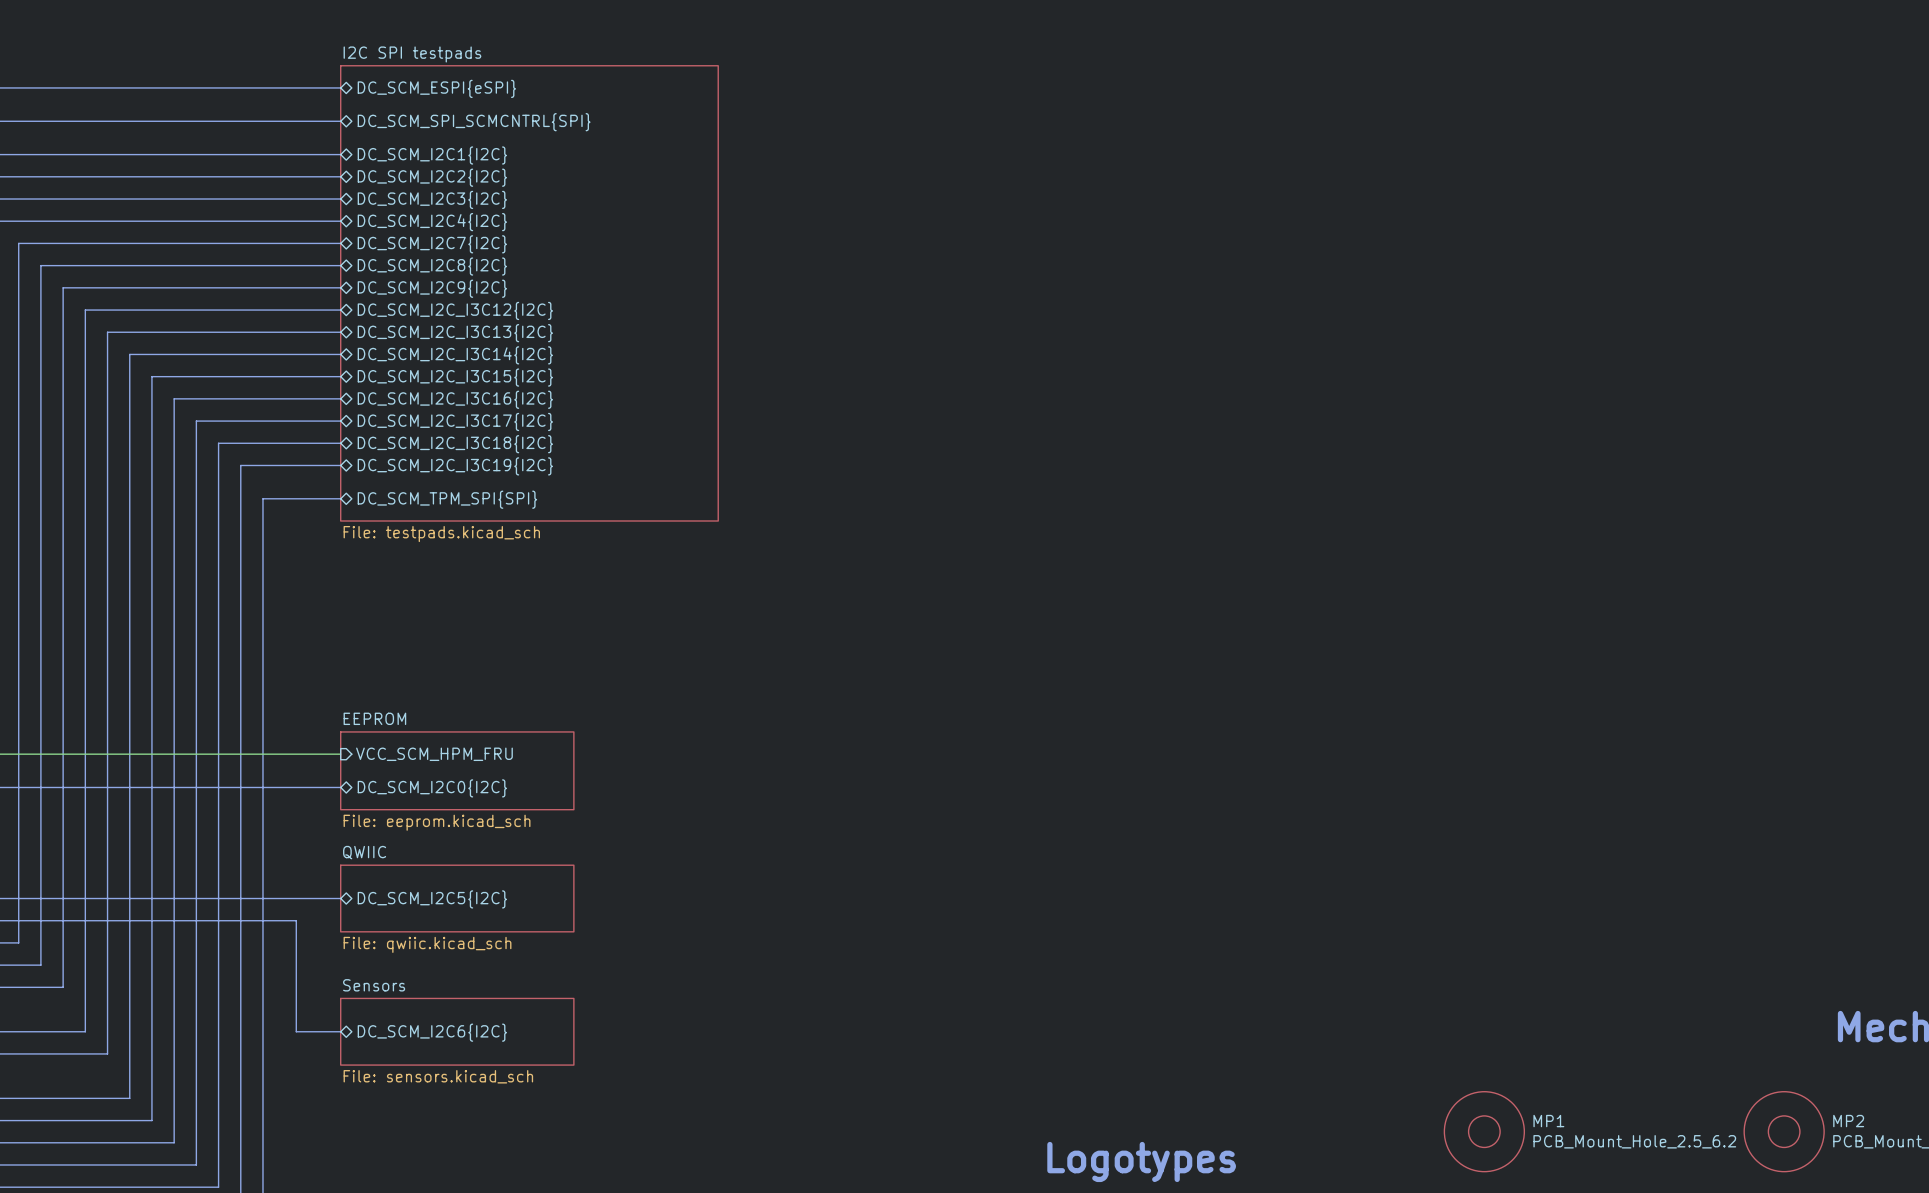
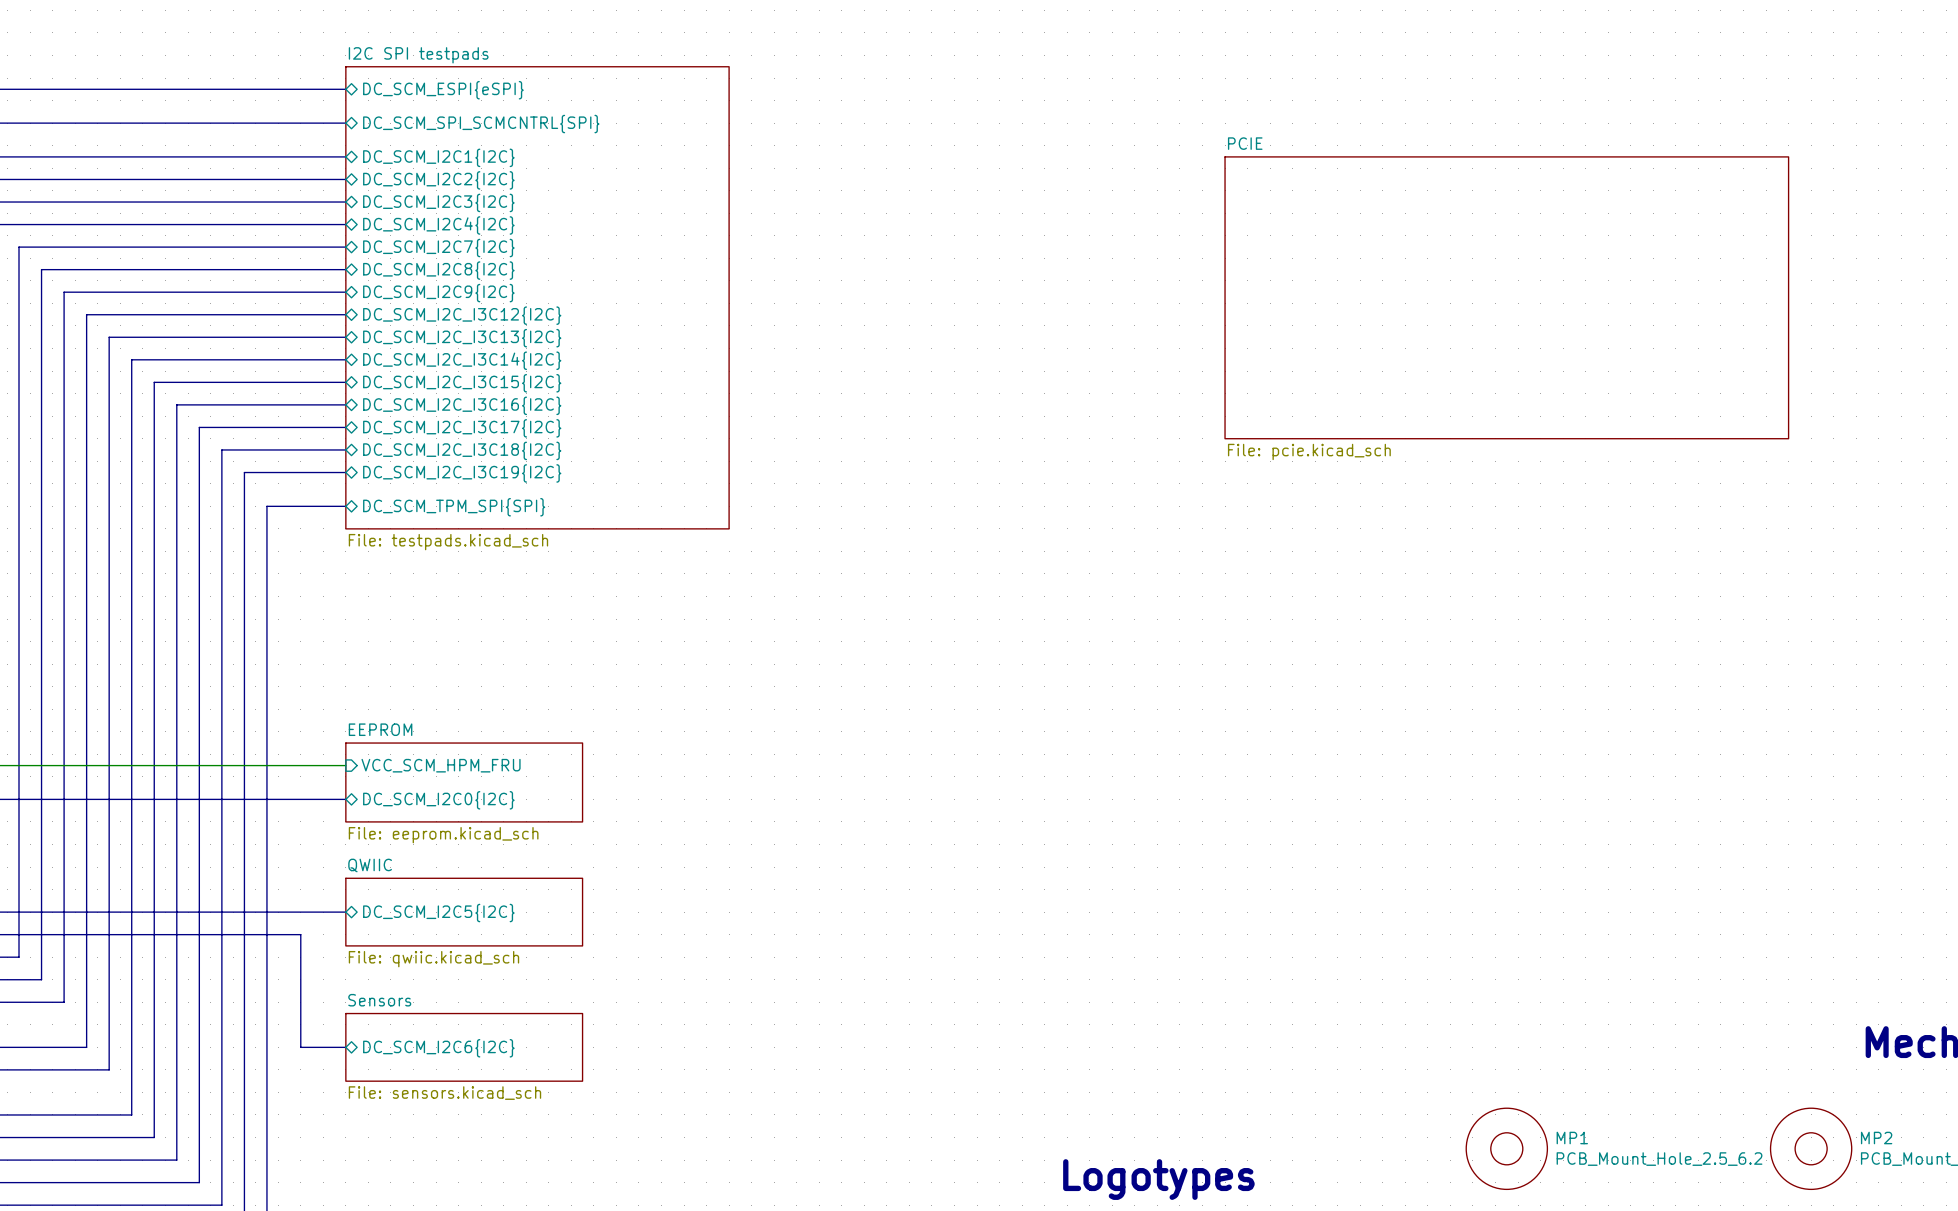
sheet PCIE: none -> File: pcie.kicad_sch (1506, 297)

